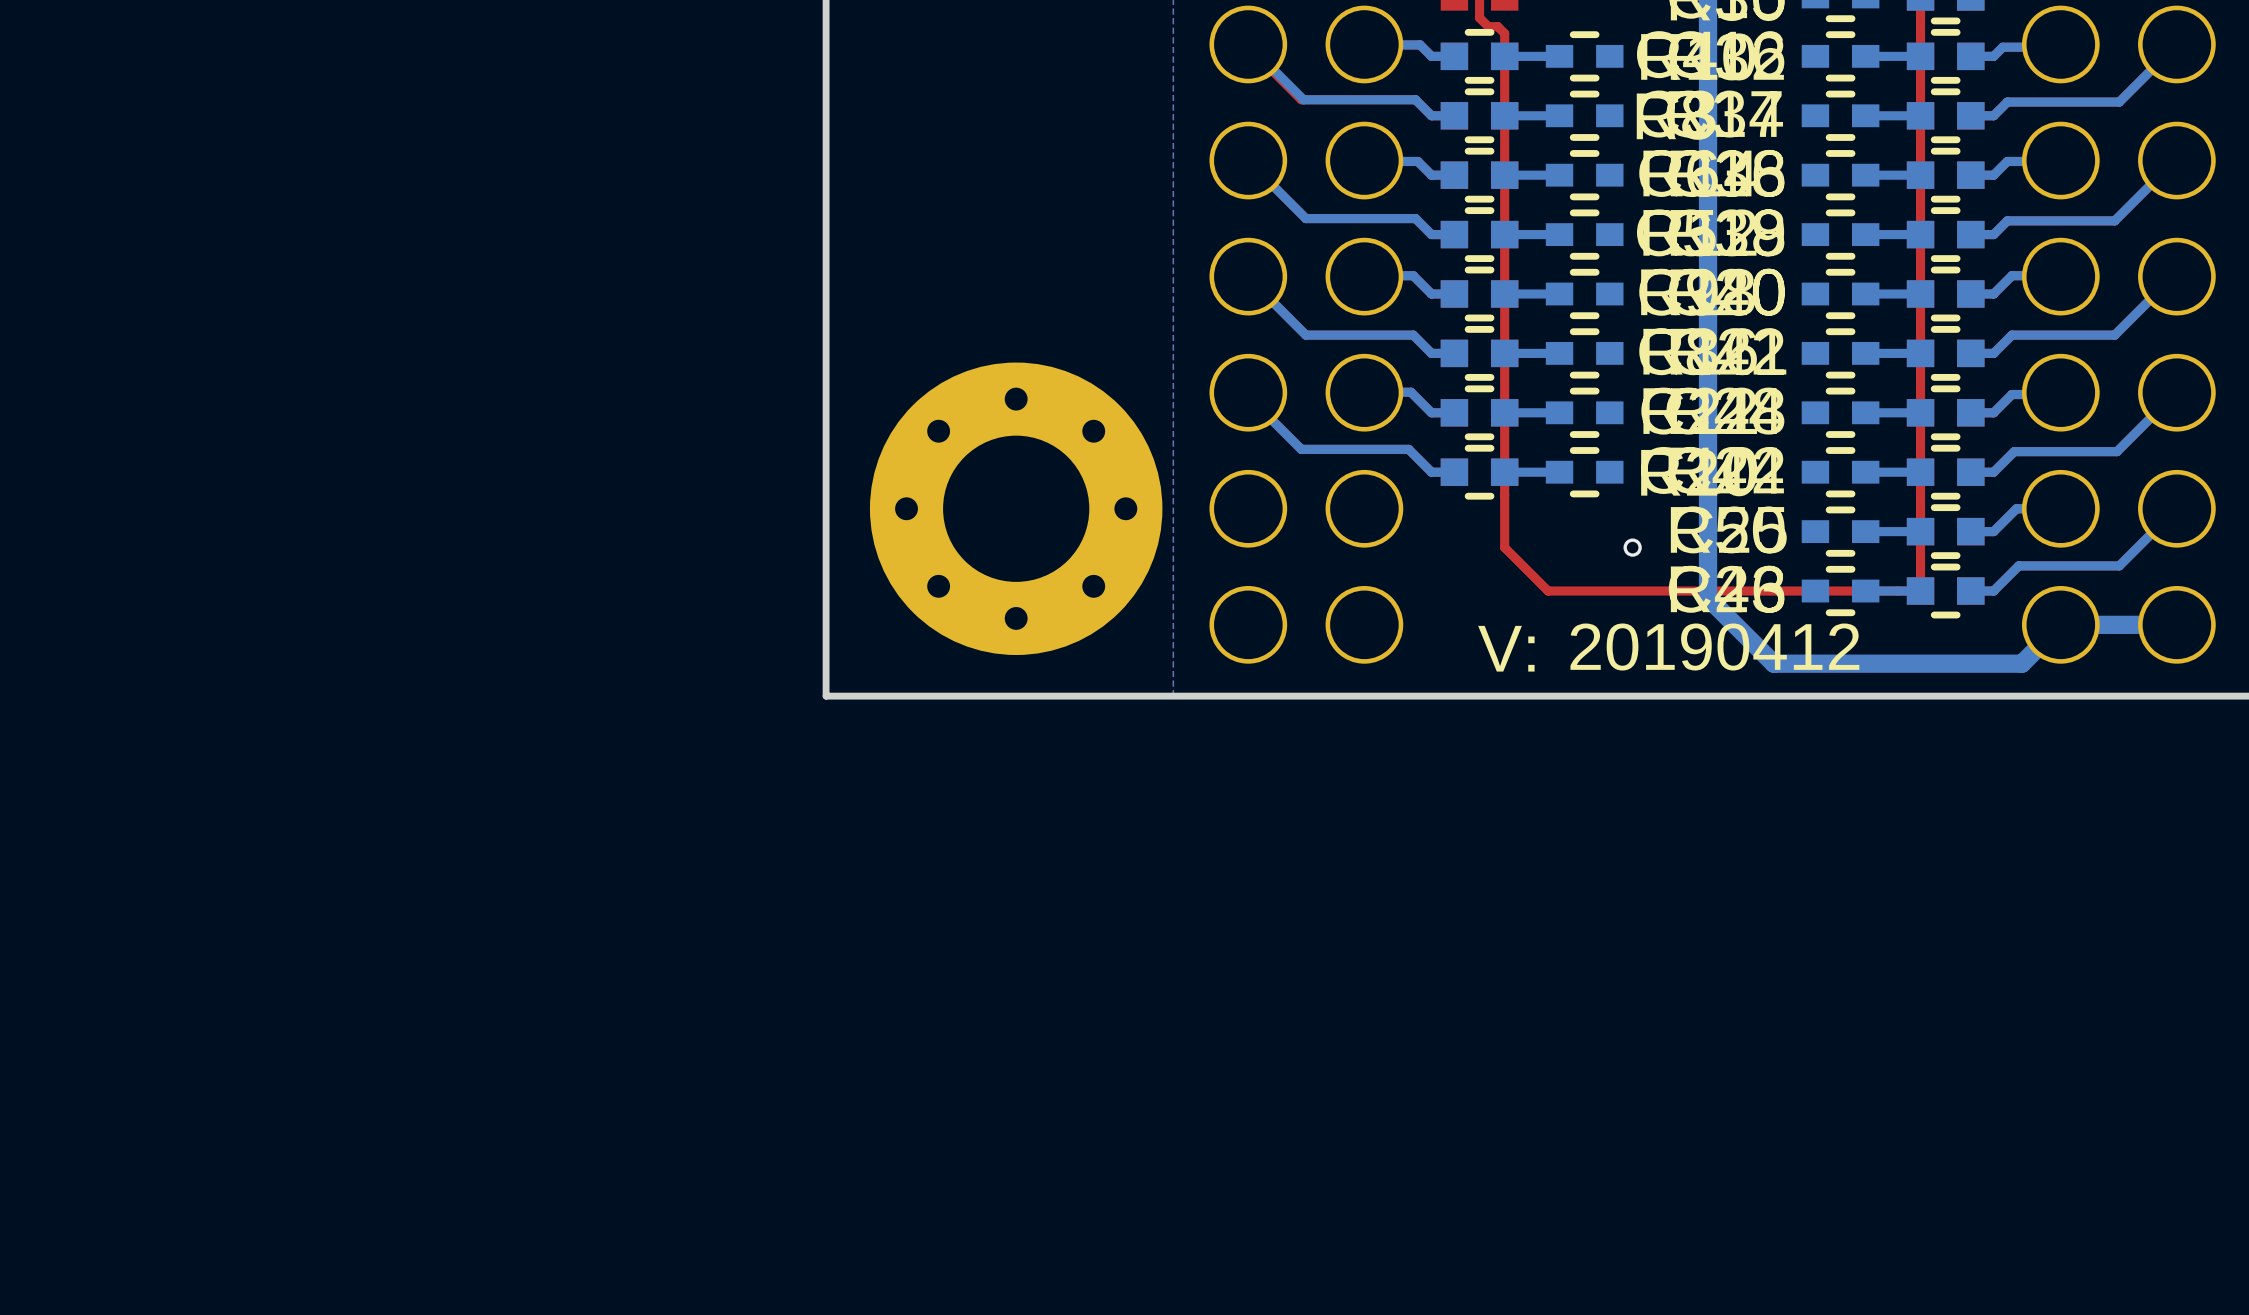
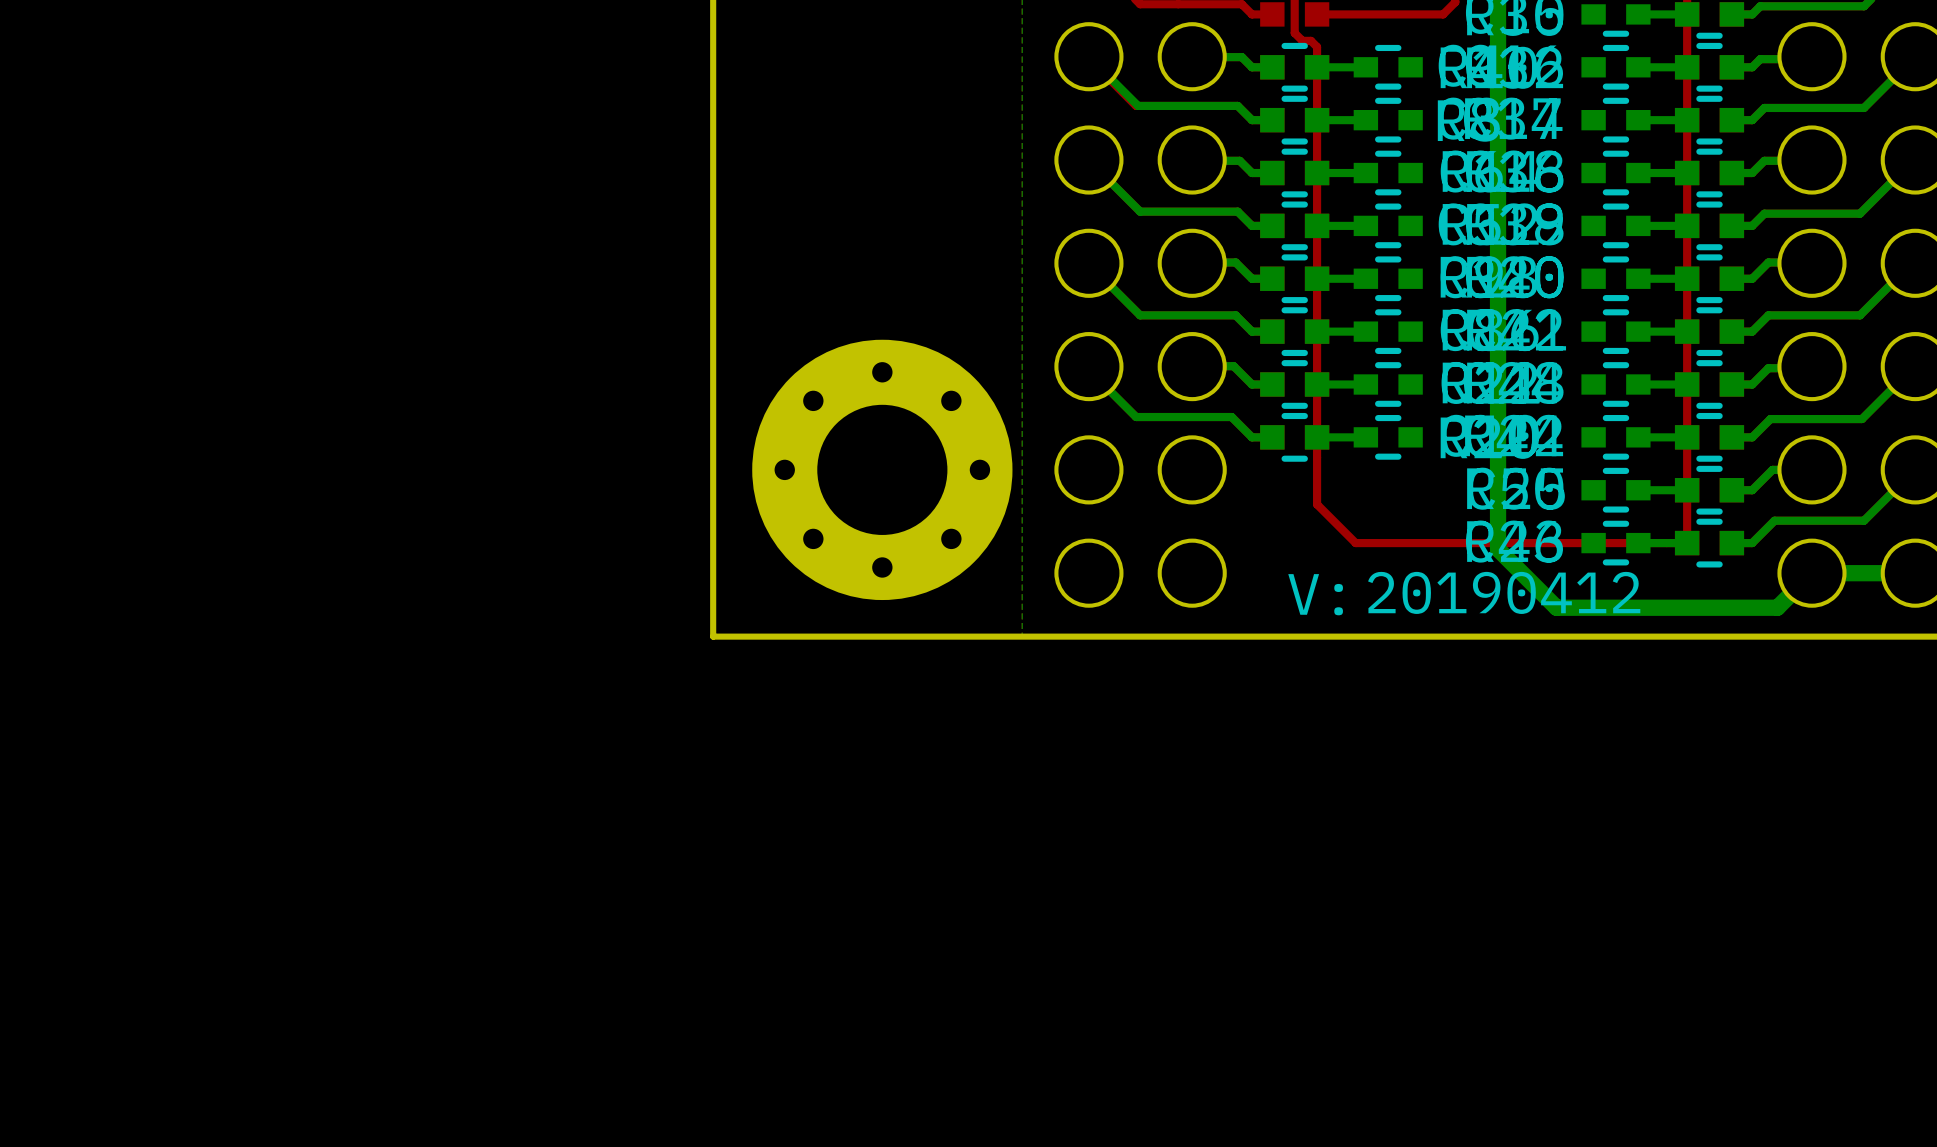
via: (1632, 547) -> none

